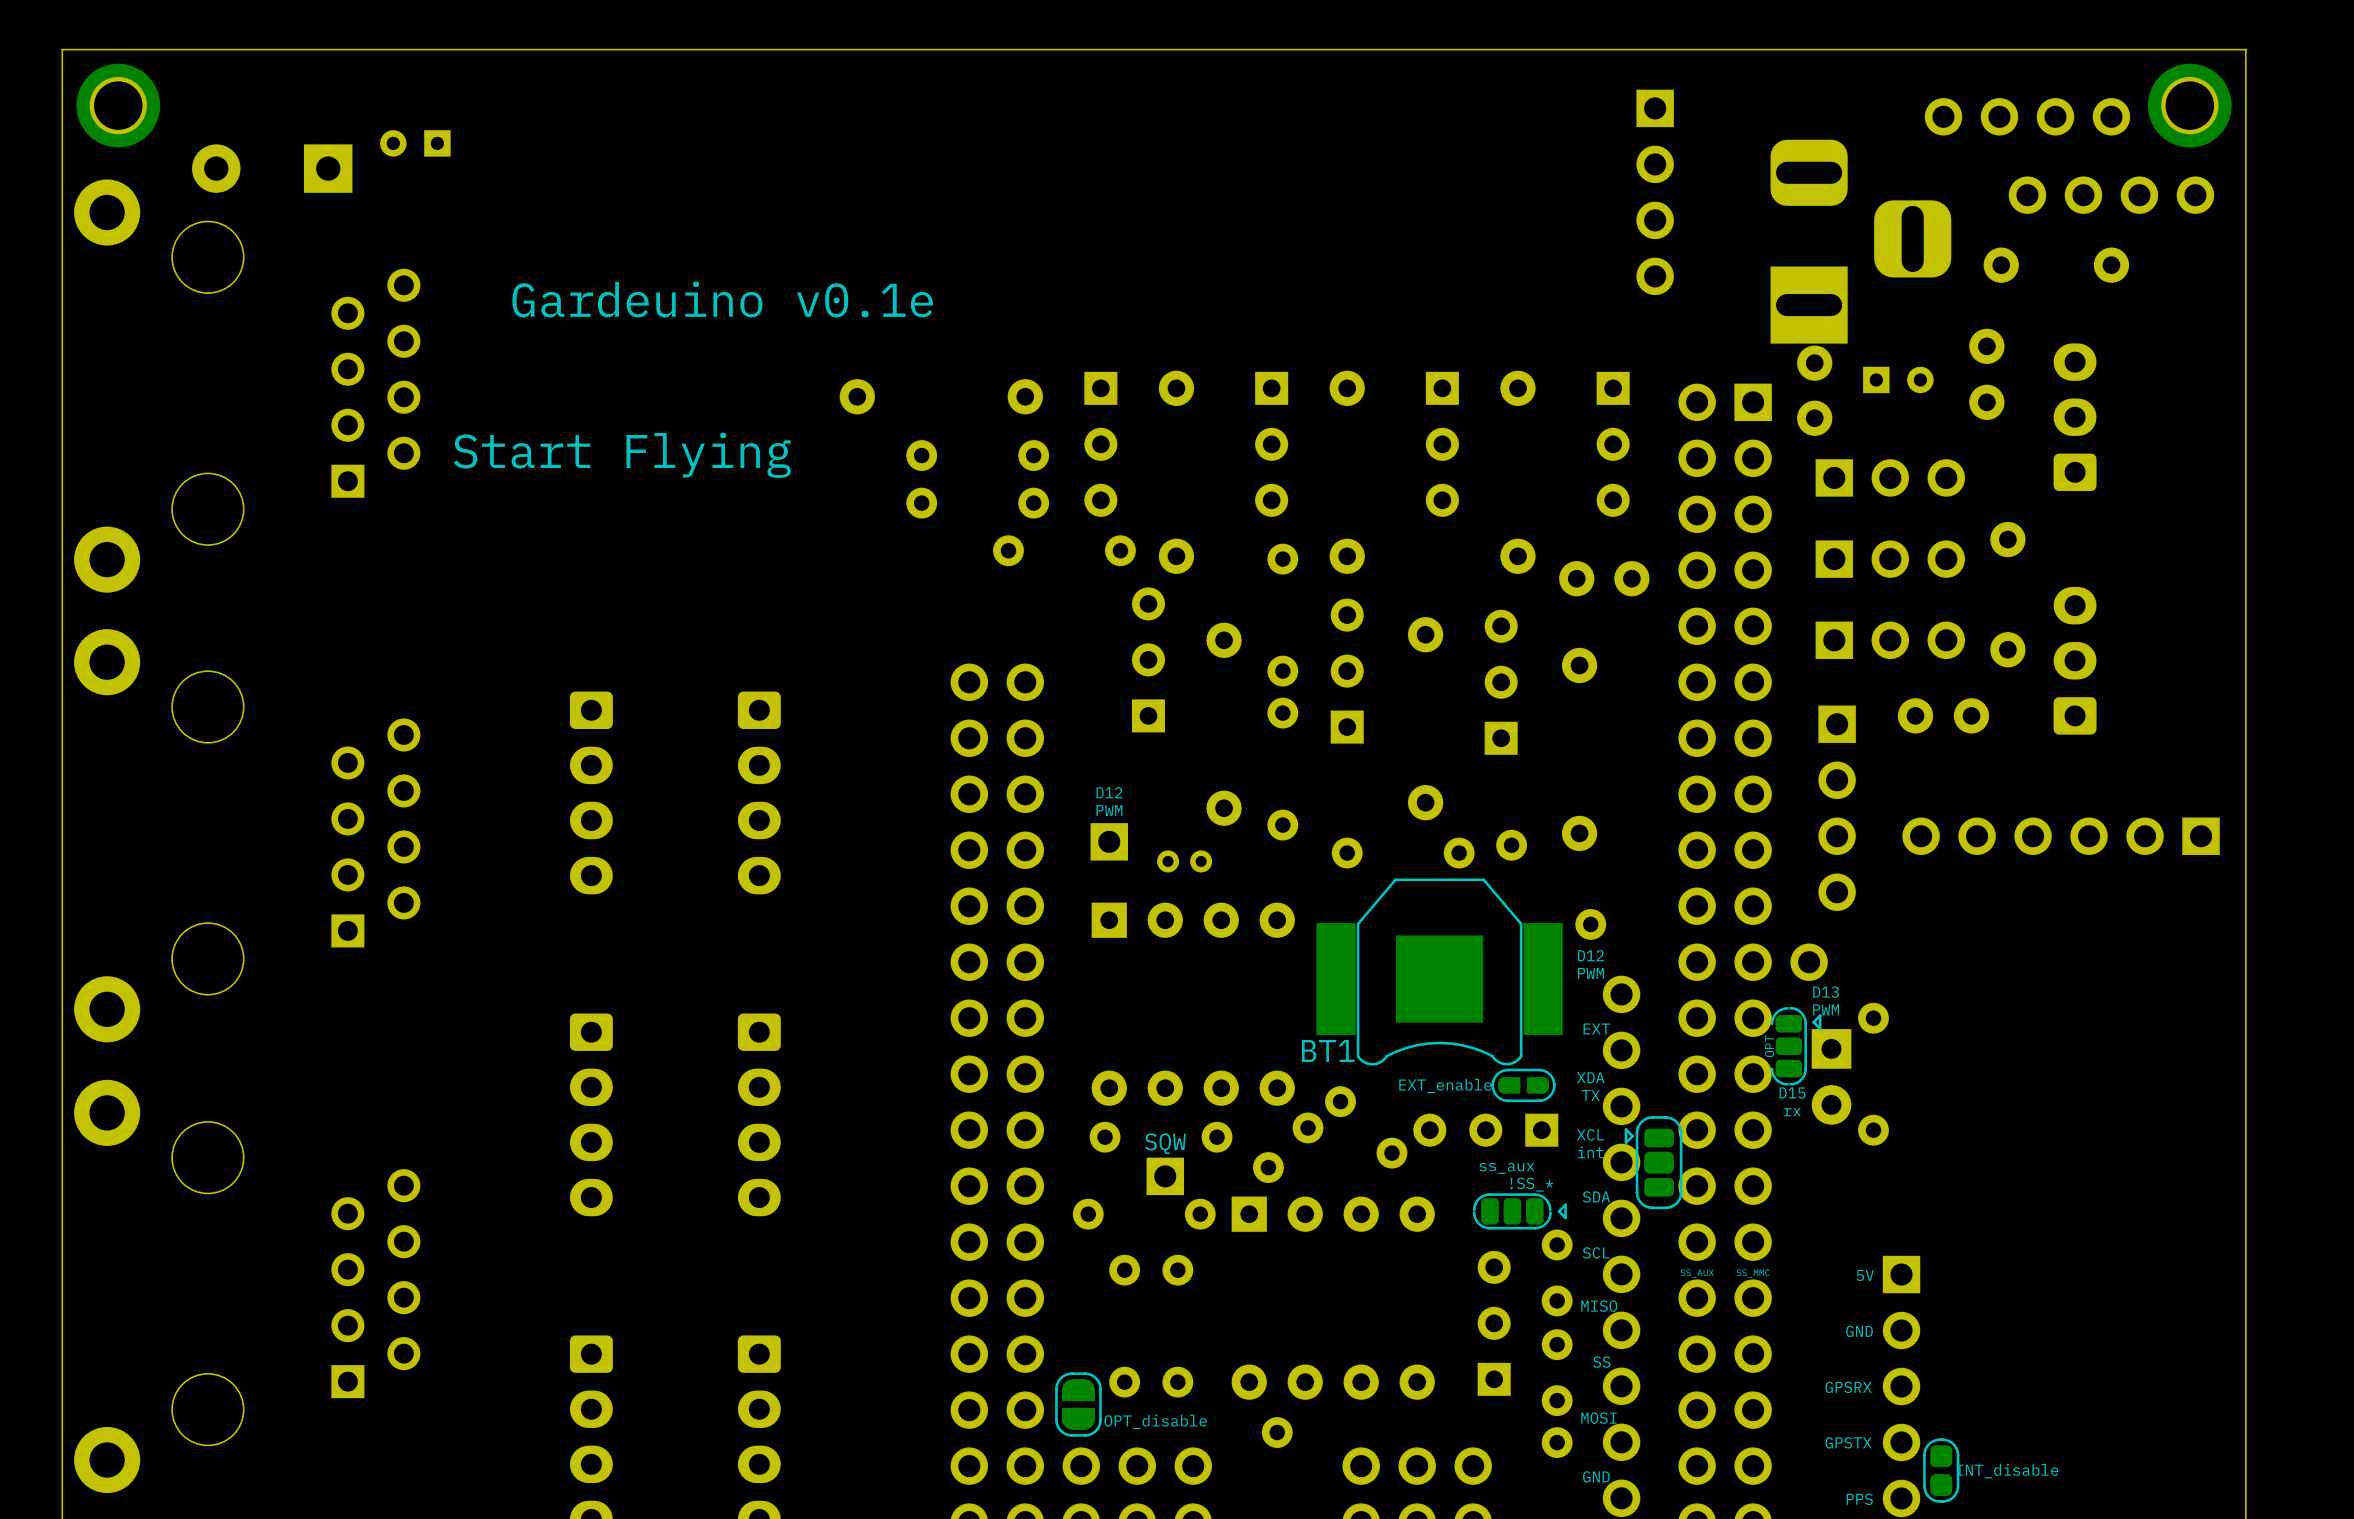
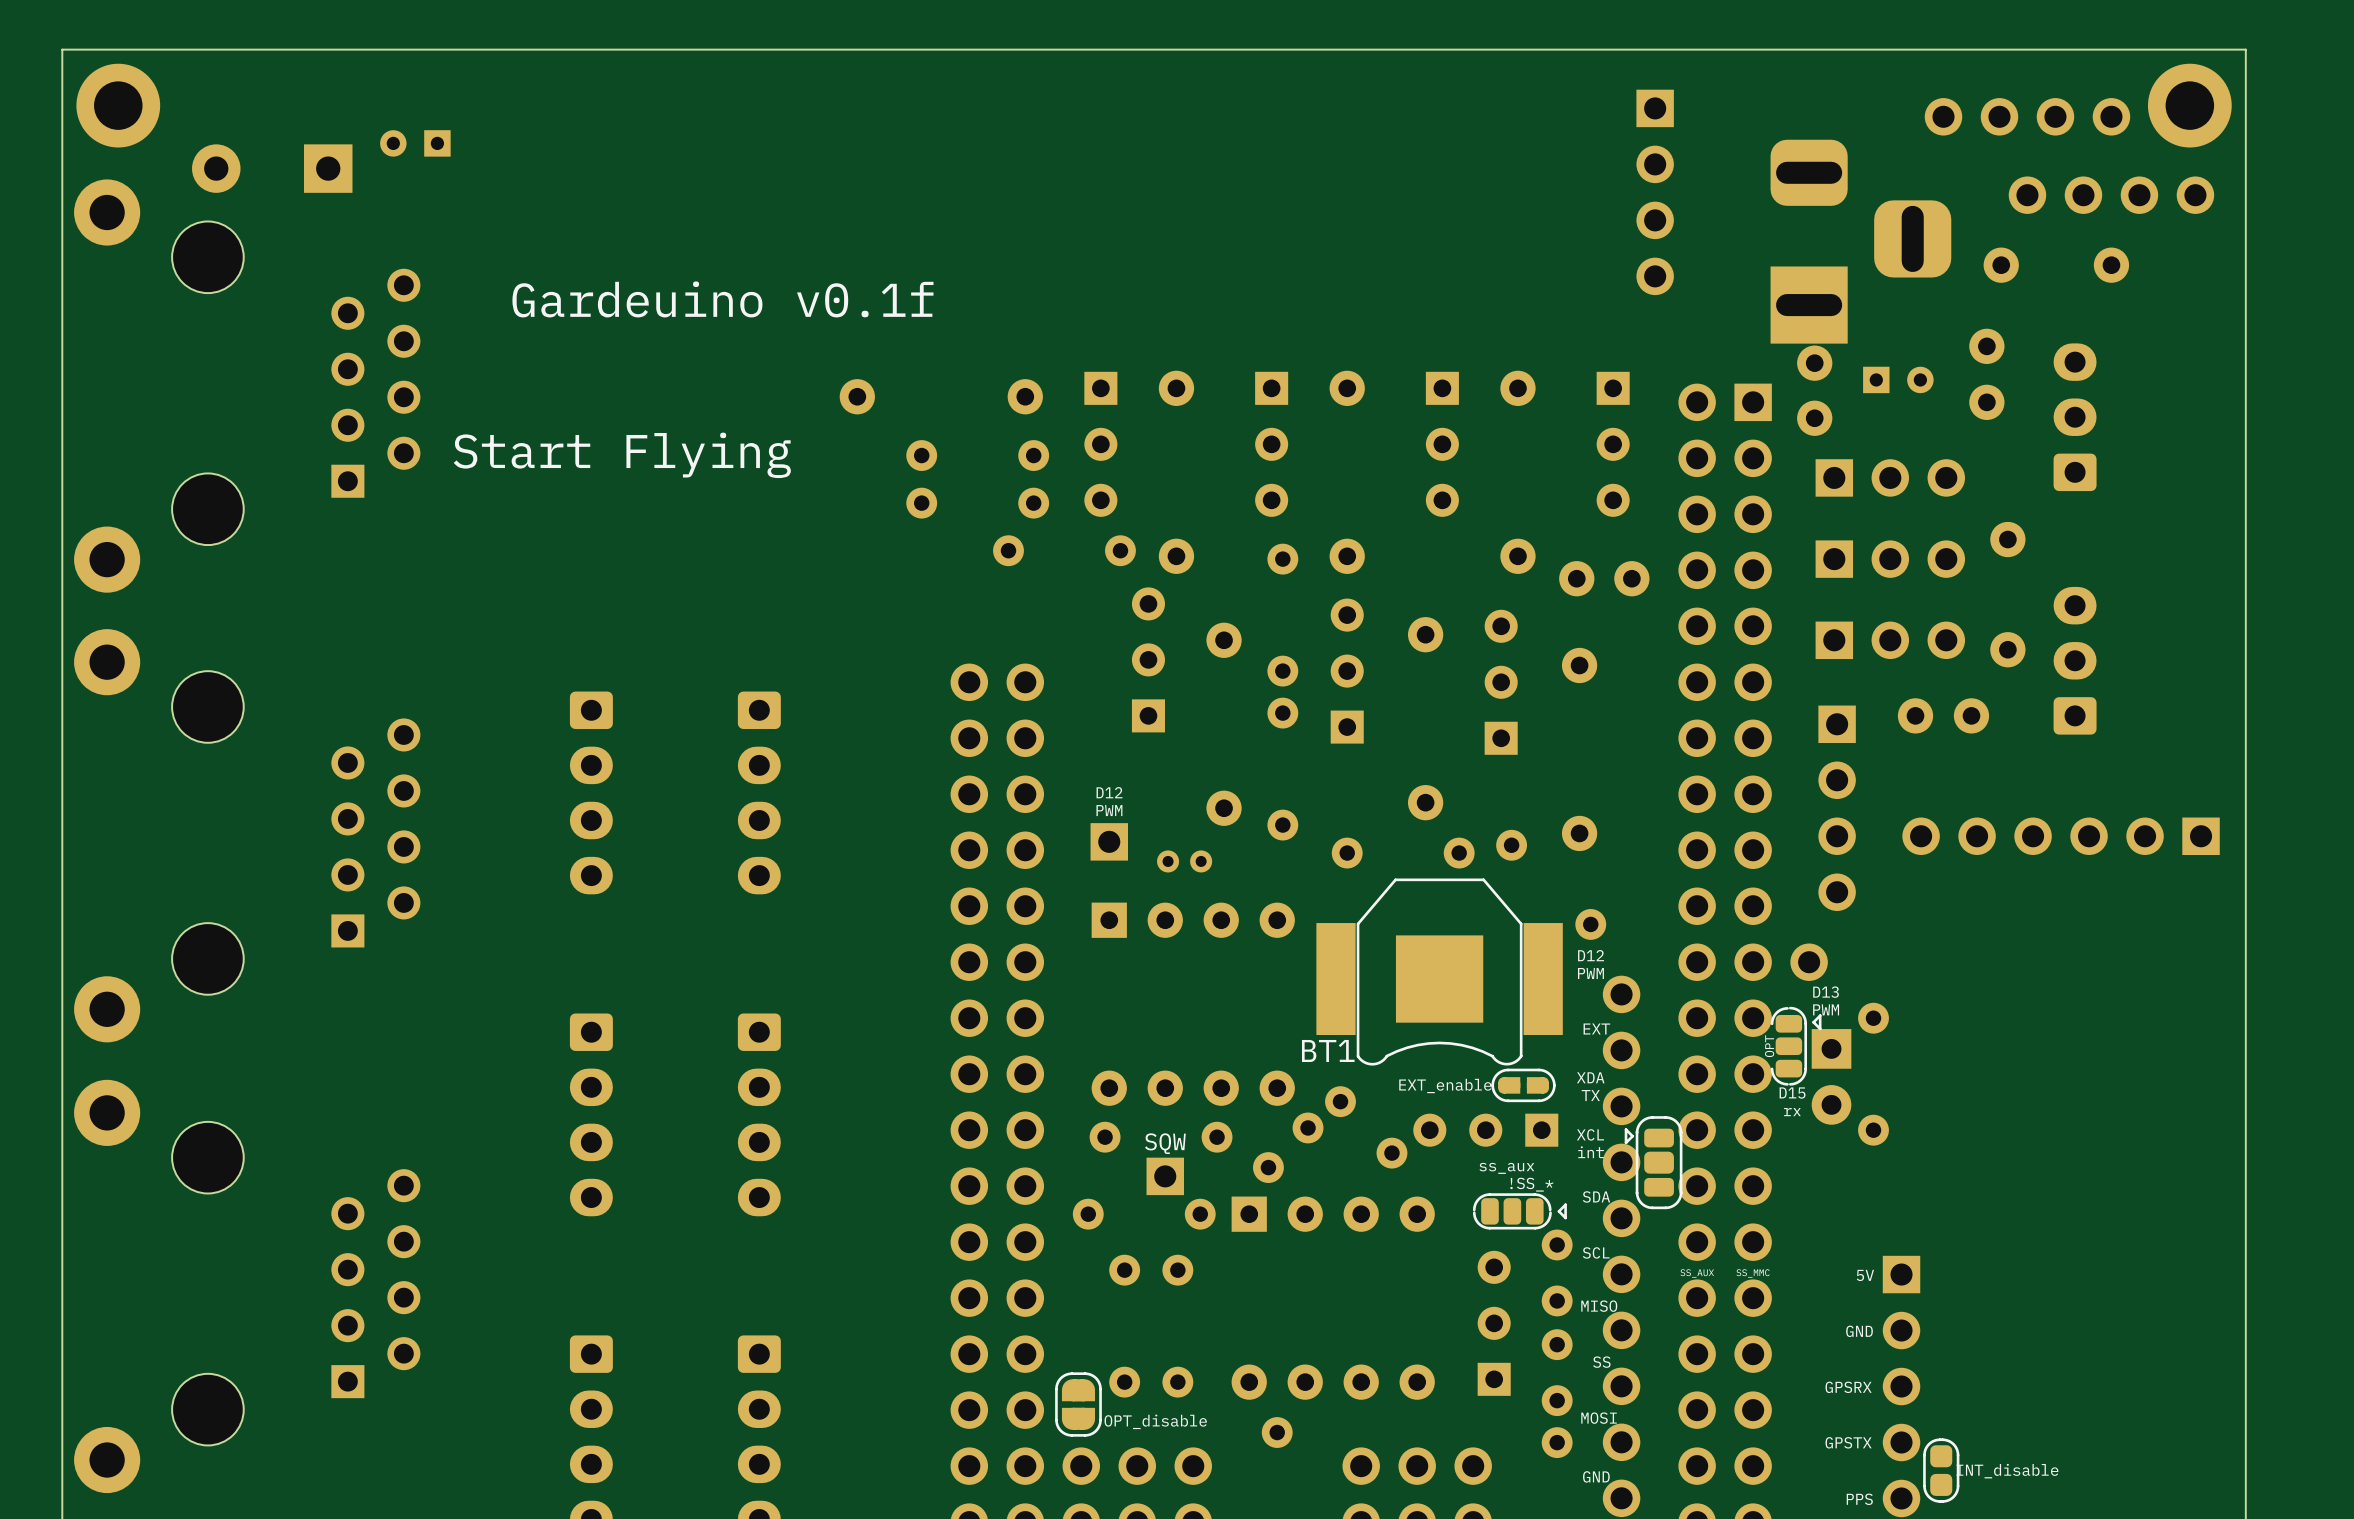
text: Gardeuino v0.1e (722, 299) -> Gardeuino v0.1f (722, 299)

